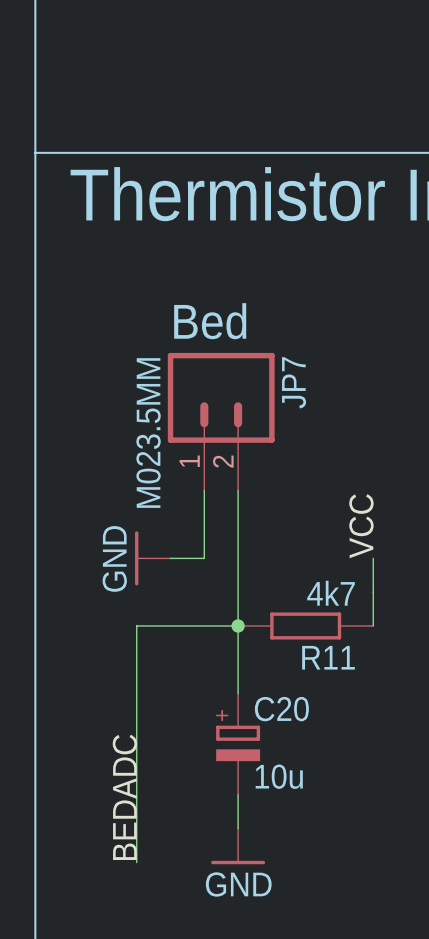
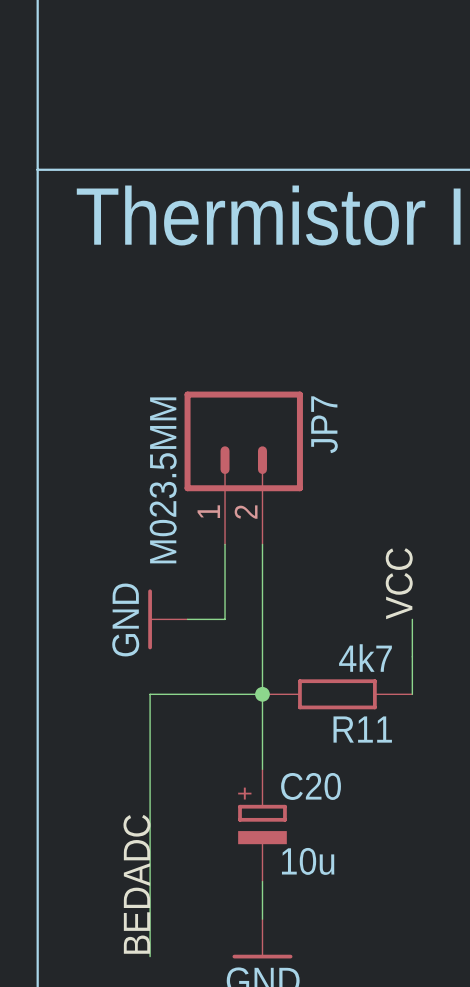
text: Bed (210, 321) -> none

